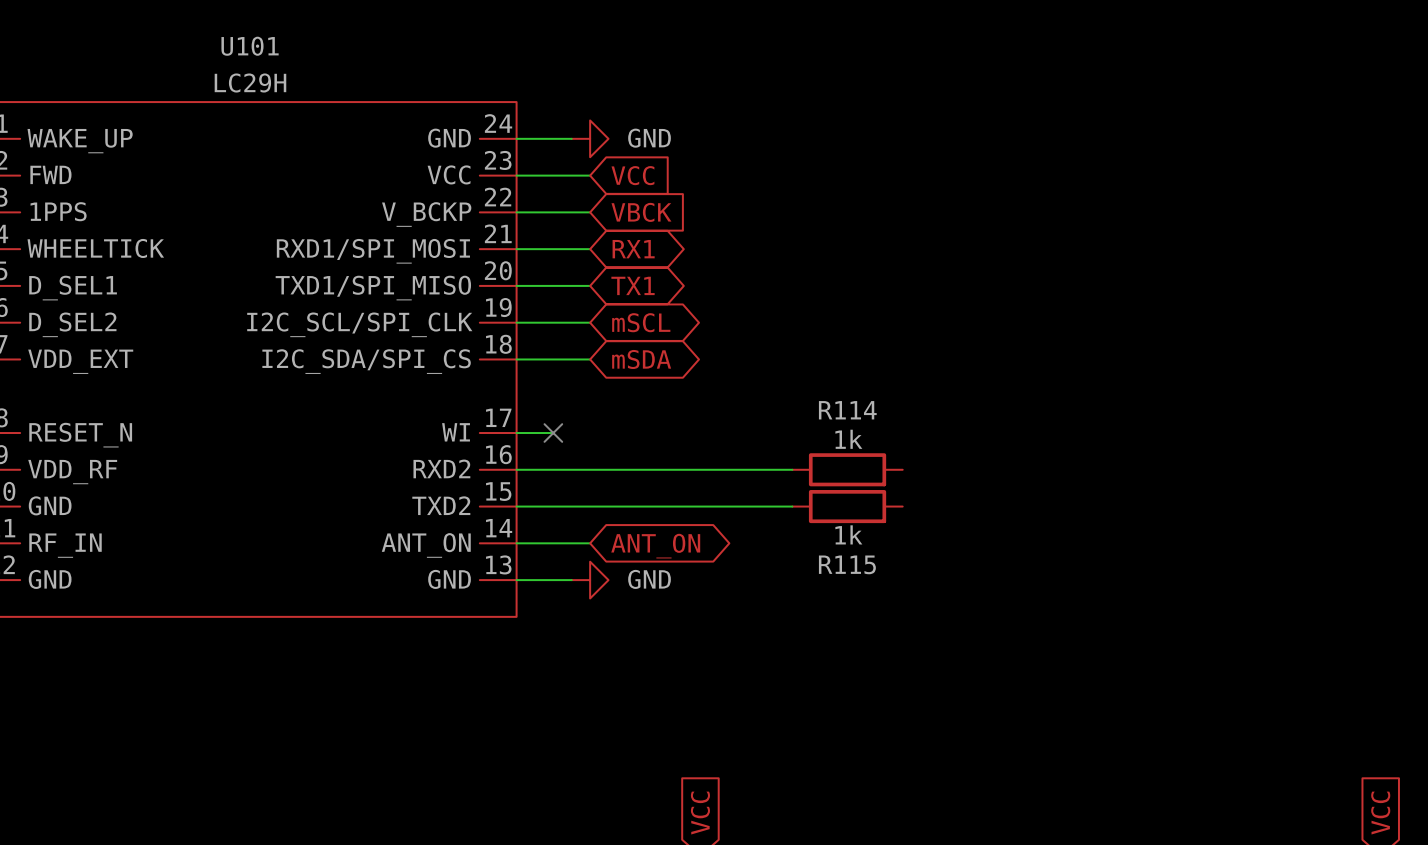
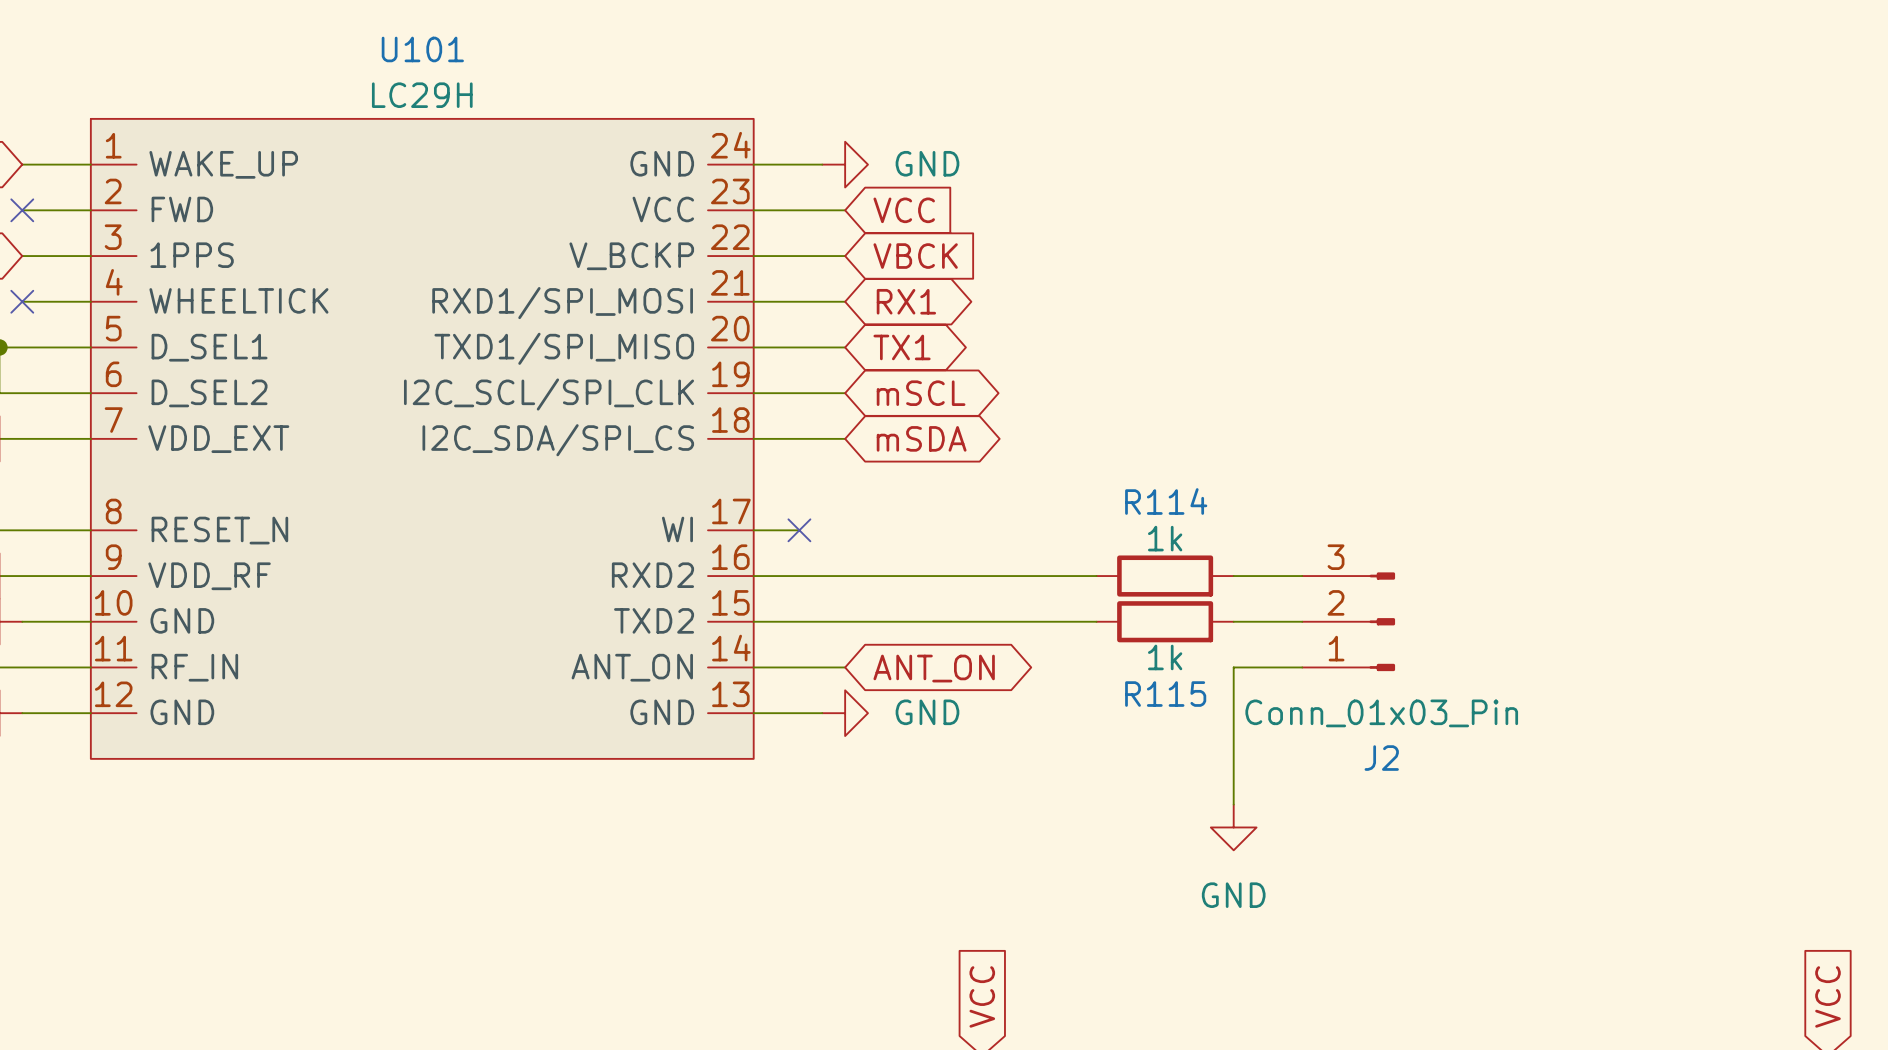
wire: none -> (1233, 576) (1302, 576)
wire: none -> (1233, 621) (1302, 621)
J2: none -> Conn_01x03_Pin (1348, 621)
wire: none -> (1302, 667) (1233, 667) (1233, 804)
power symbol: none -> GND (1233, 827)

